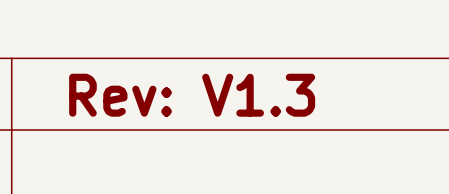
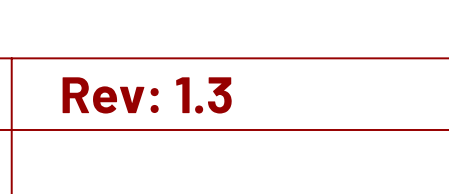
title block: Rev: V1.3 (192, 95) -> Rev: 1.3 (147, 95)

